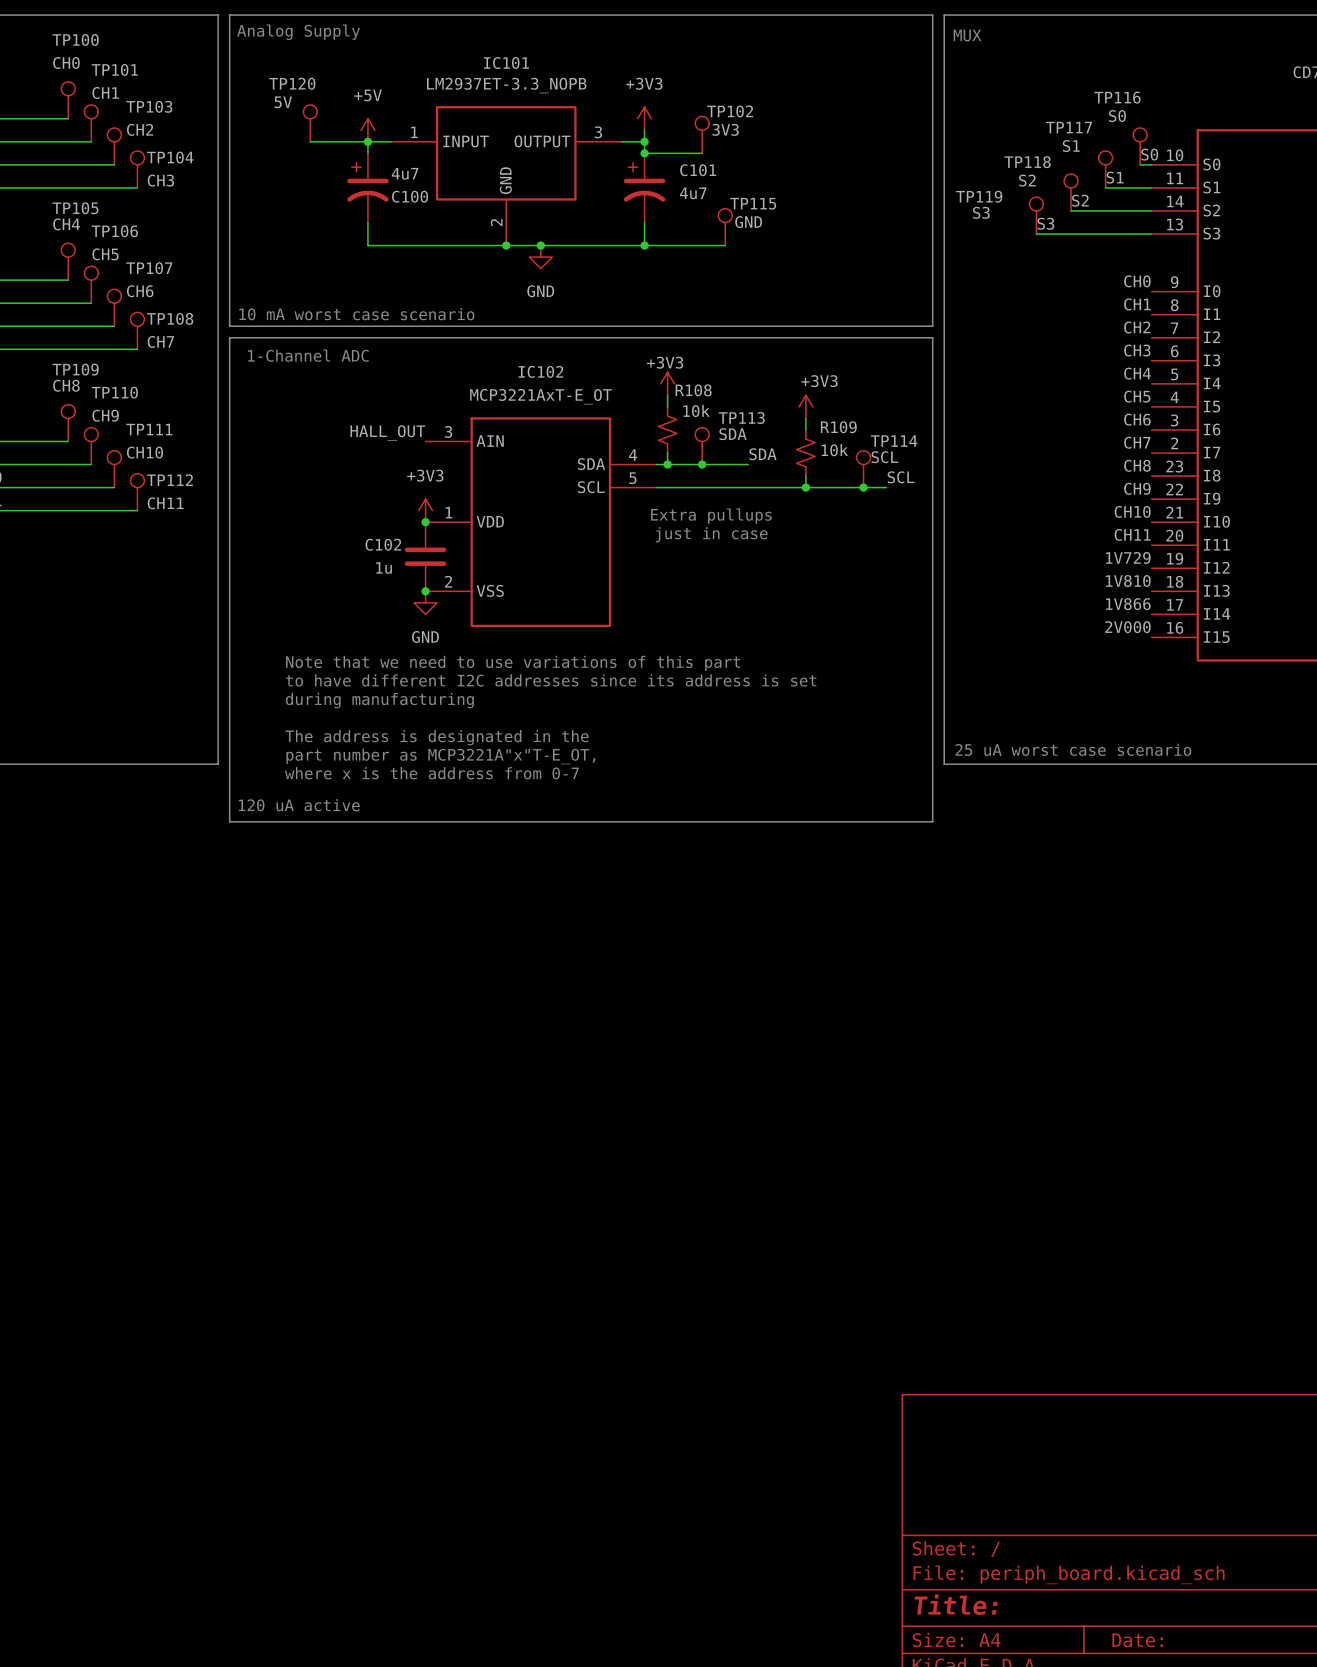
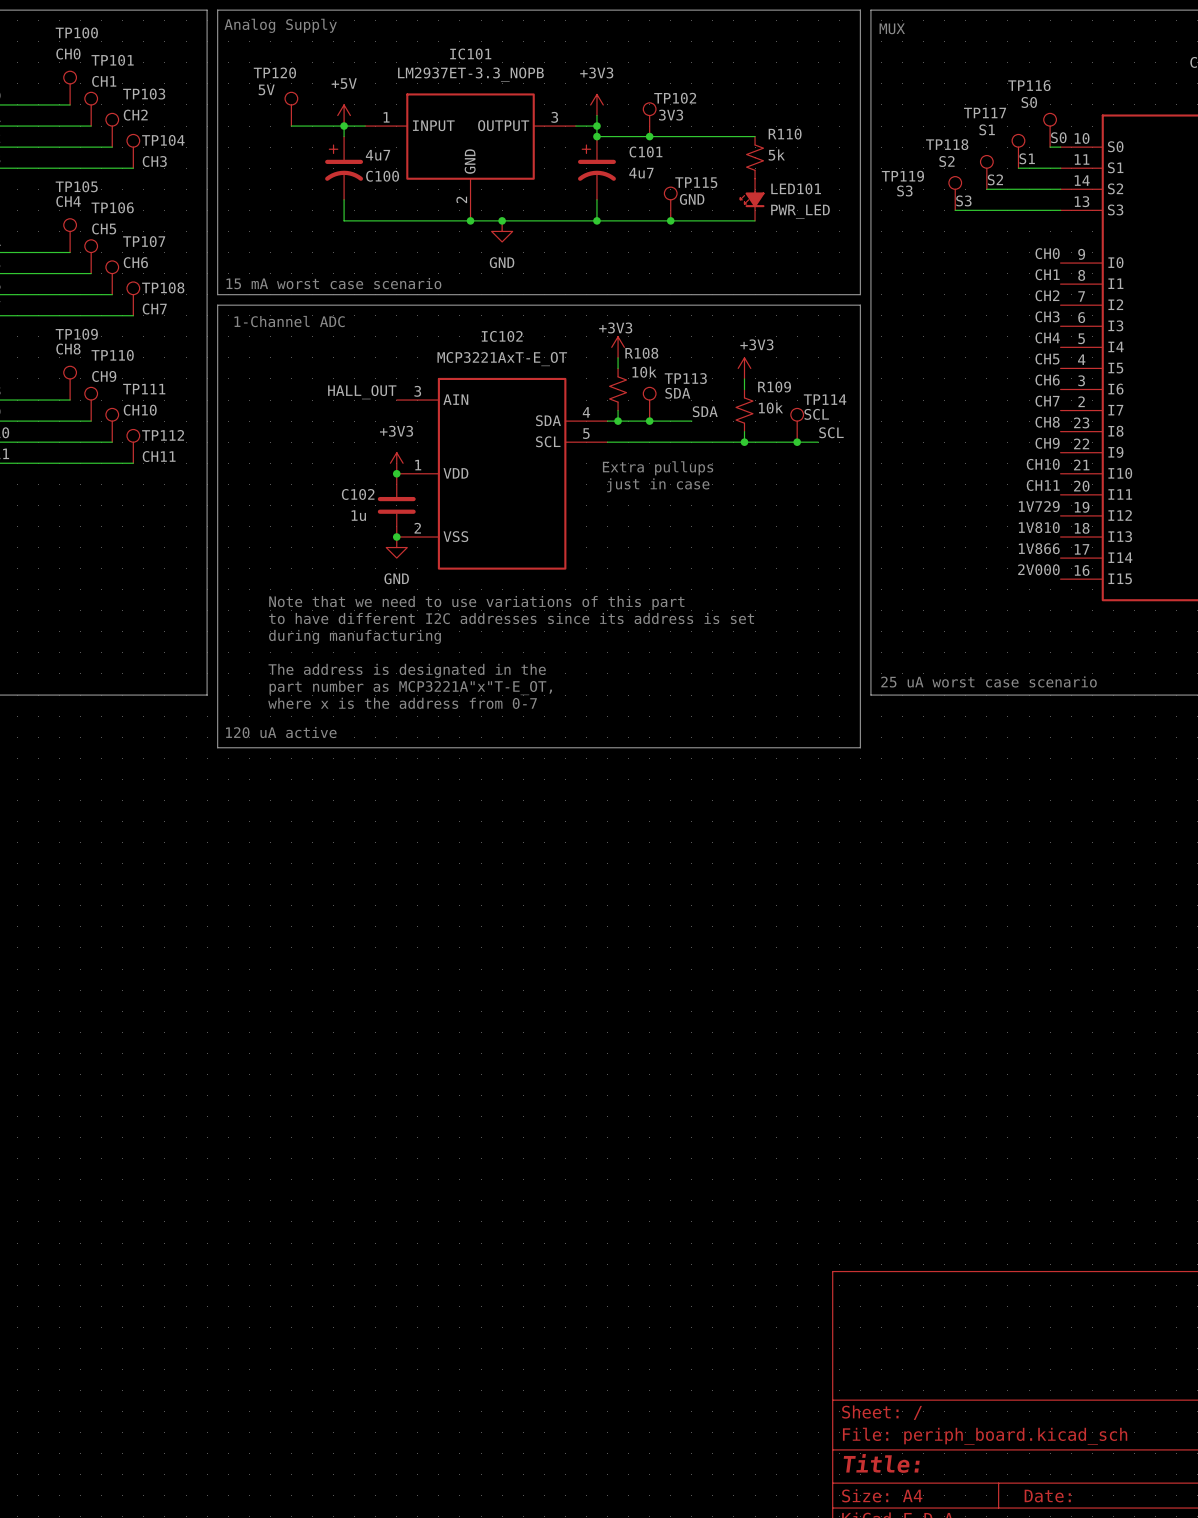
wire: none -> (649, 136) (755, 136)
junction: none -> (649, 136)
R110: none -> 5k (755, 157)
LED101: none -> PWR_LED (752, 199)
wire: none -> (670, 220) (755, 220)
junction: none -> (670, 220)
text: 10 mA worst case scenario (356, 314) -> 15 mA worst case scenario (333, 283)

